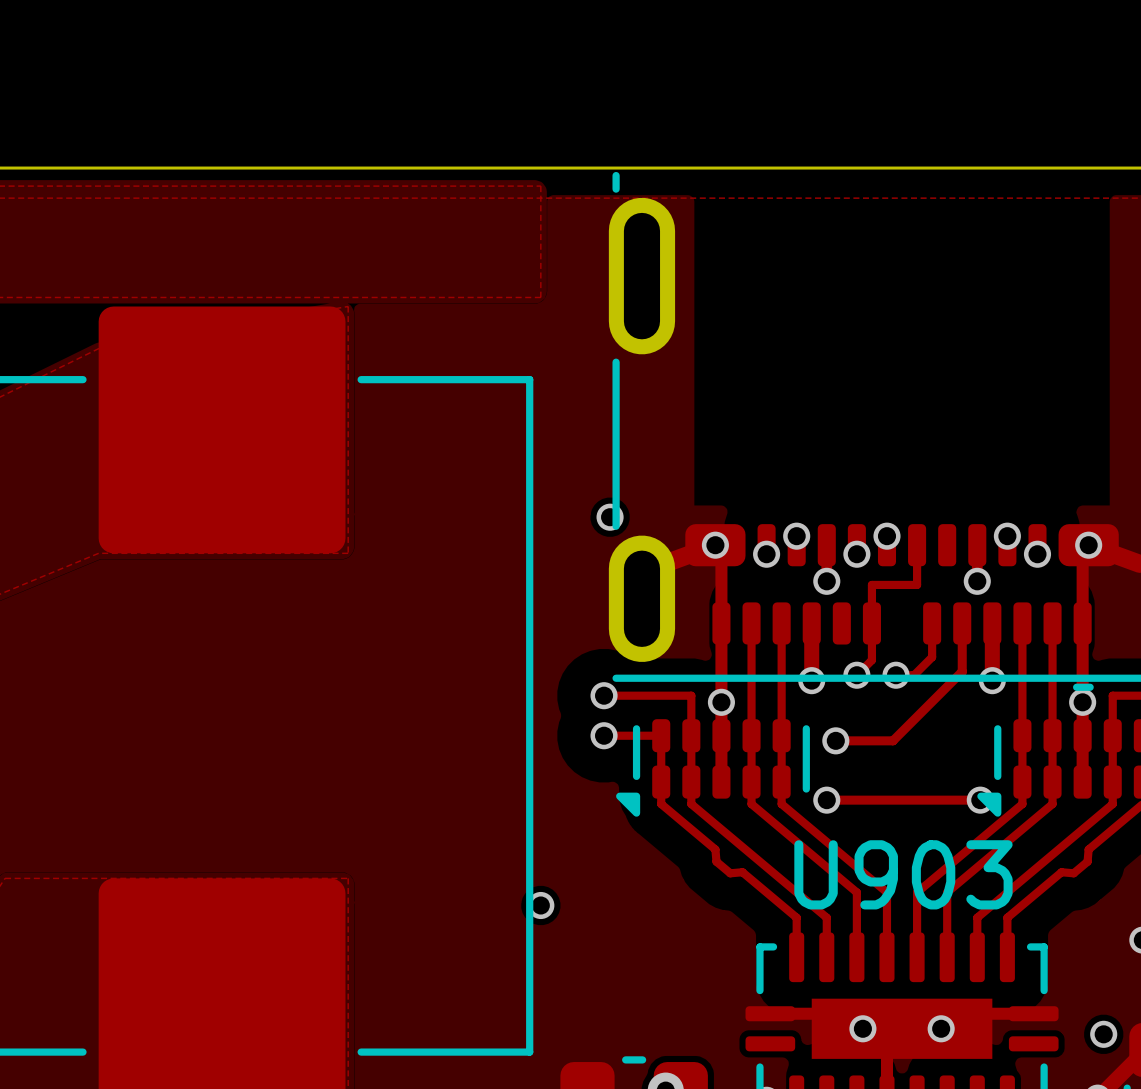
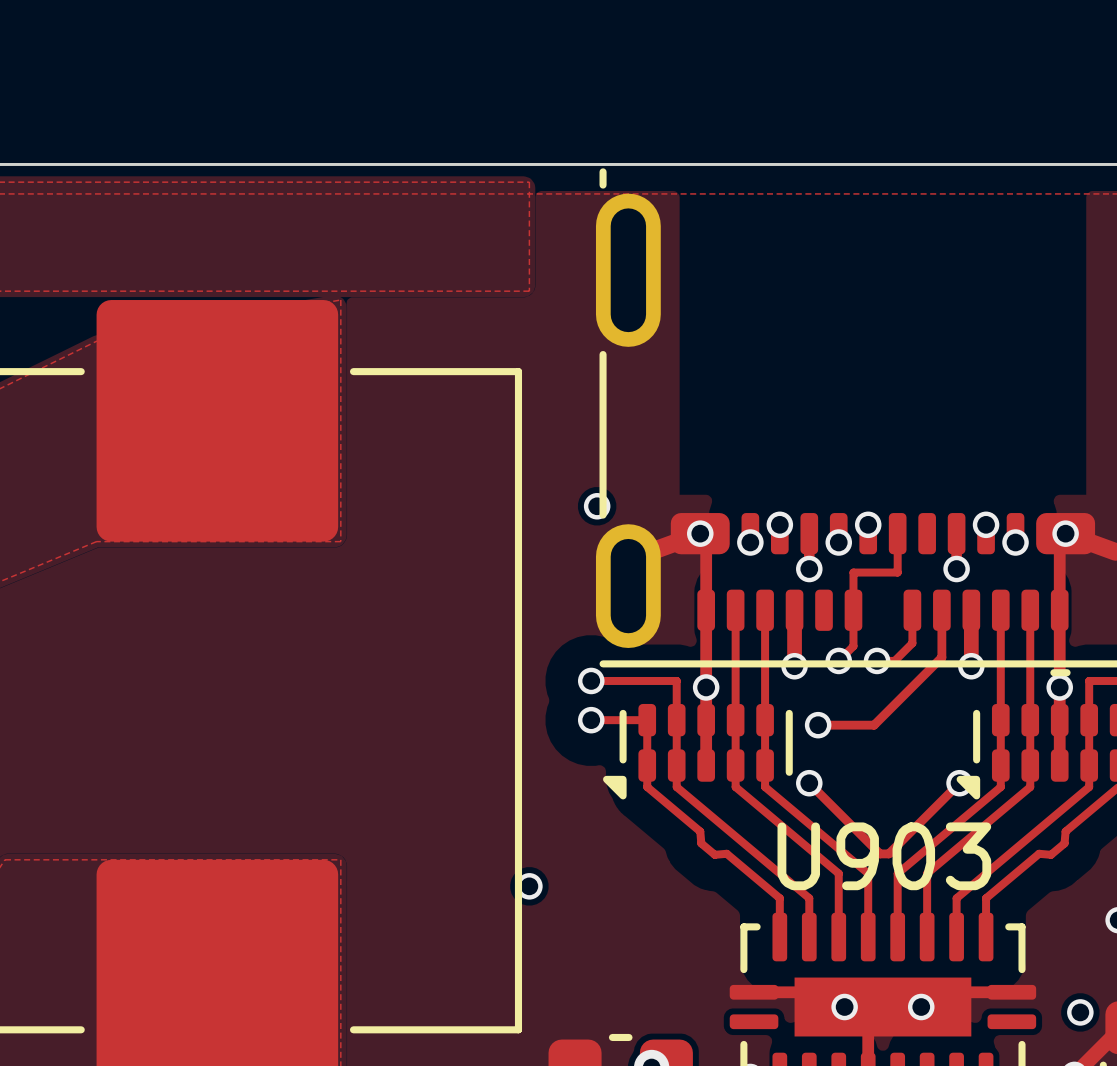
track: (826, 800) (980, 800) -> (809, 783) (880, 853) (888, 853) (959, 783)

